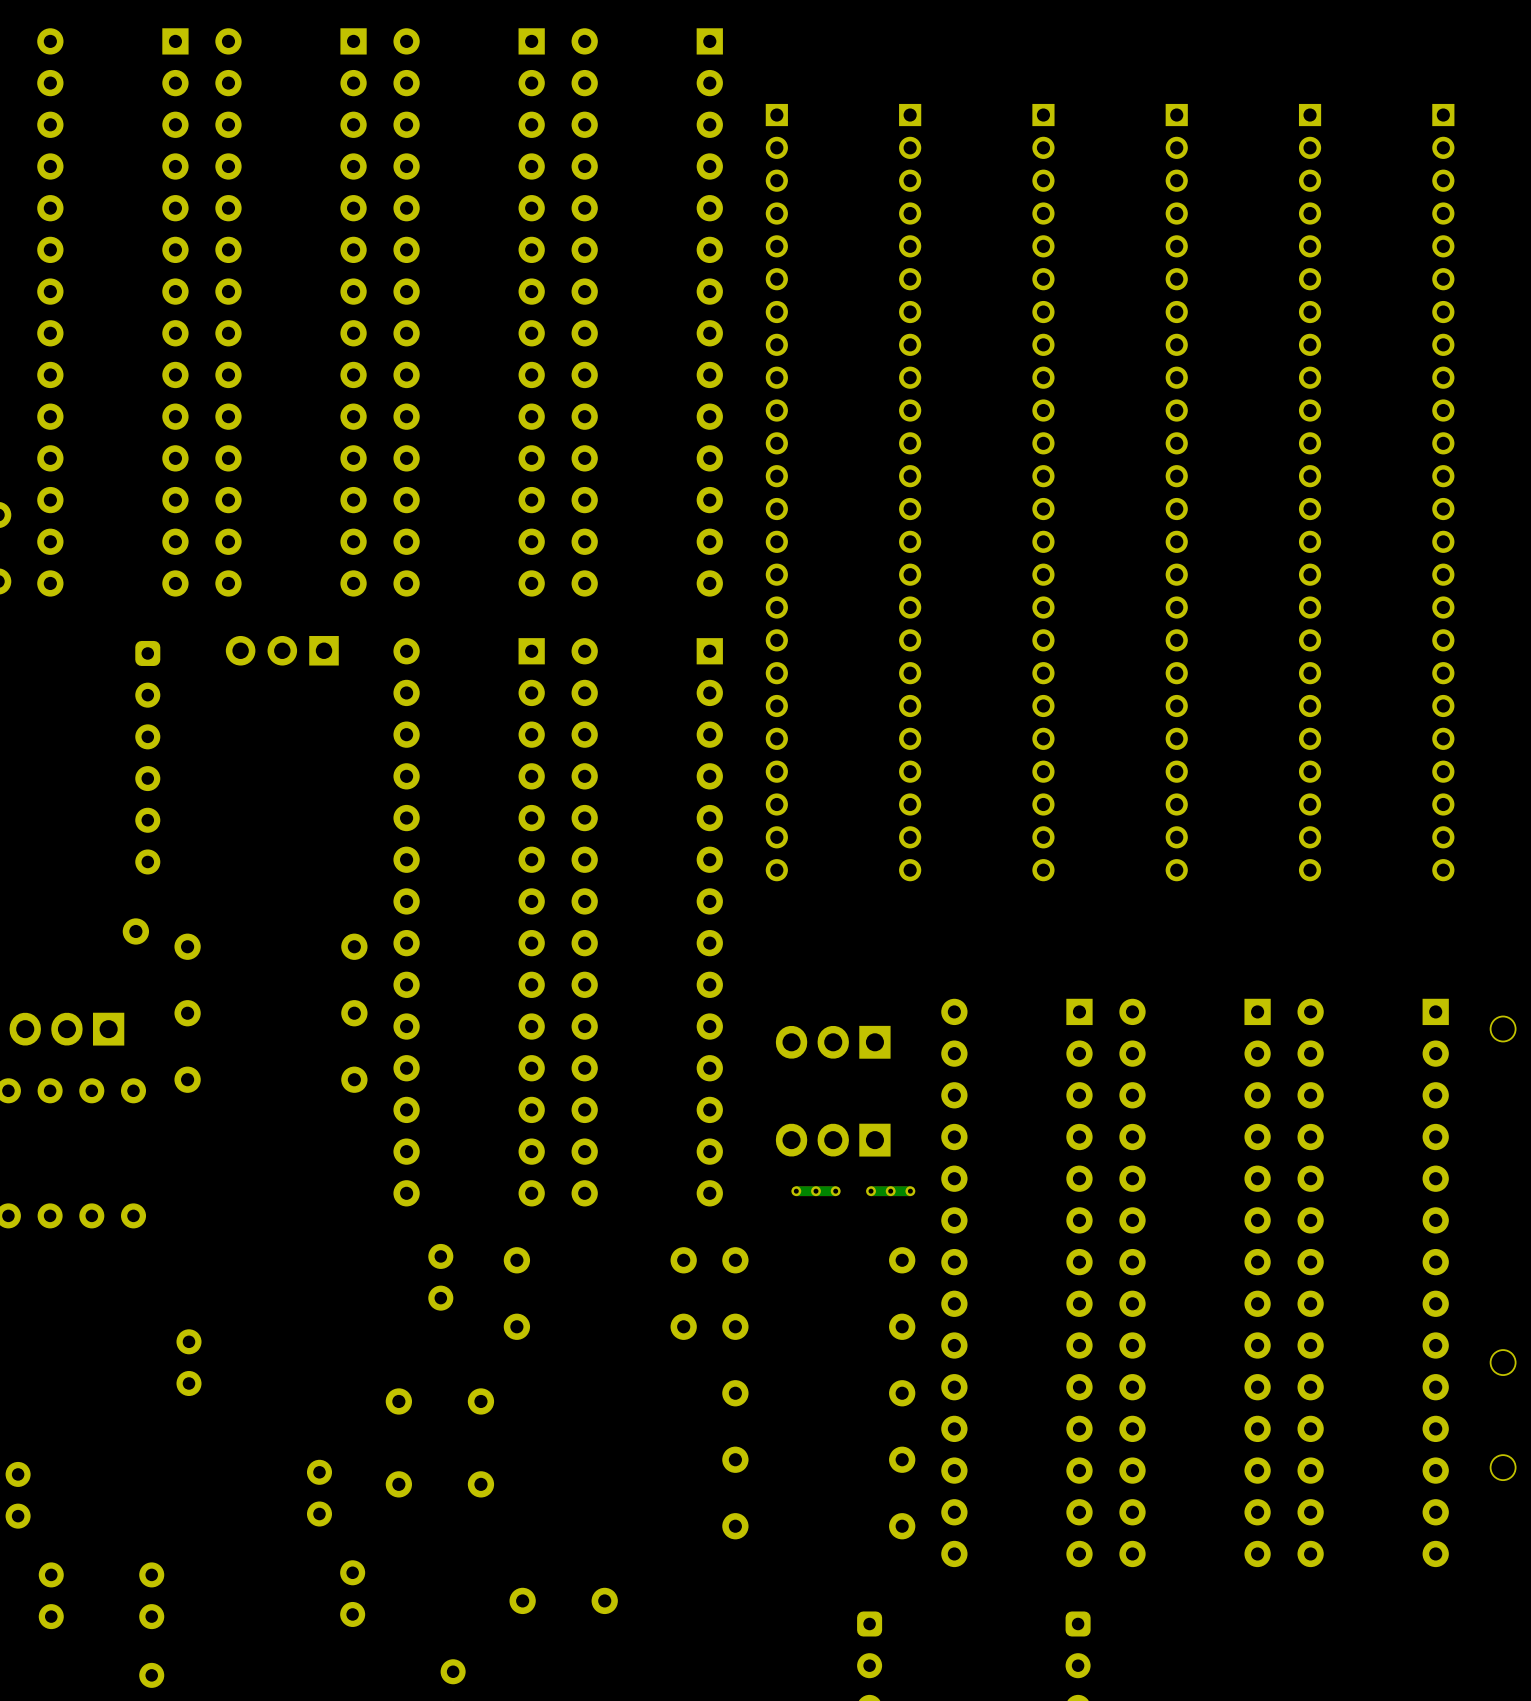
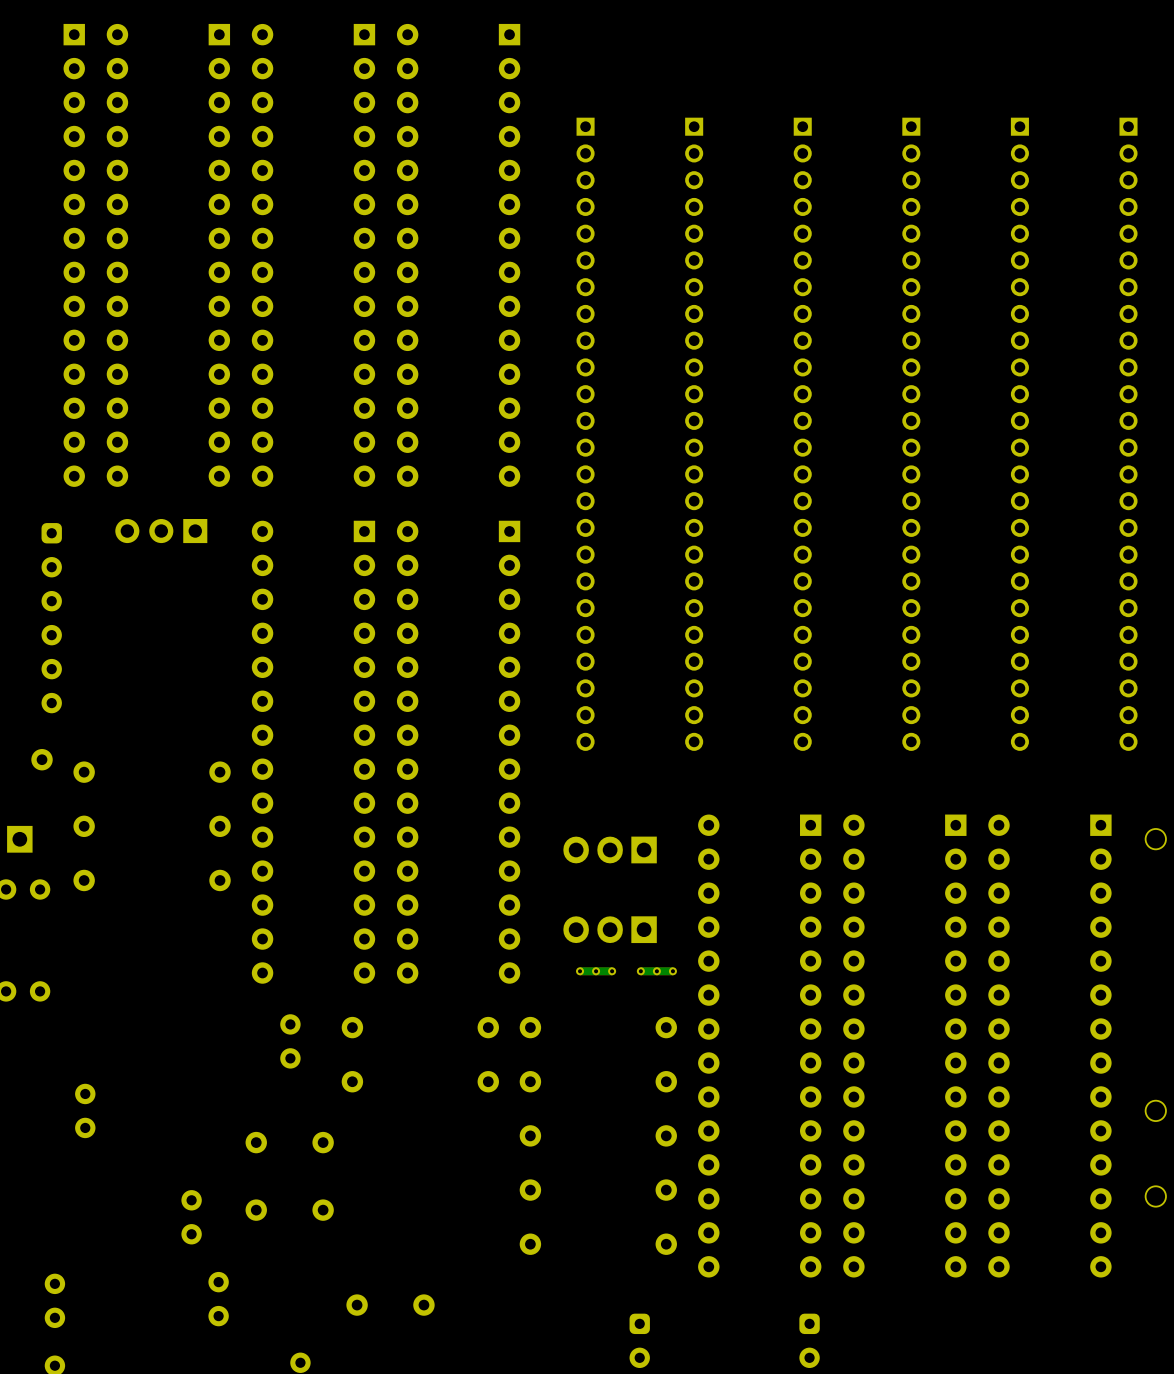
part position: (776, 492) -> (585, 434)
part position: (910, 492) -> (694, 434)
part position: (1043, 492) -> (802, 434)
part position: (1176, 492) -> (911, 434)
part position: (1310, 492) -> (1019, 434)
part position: (1443, 492) -> (1128, 434)

